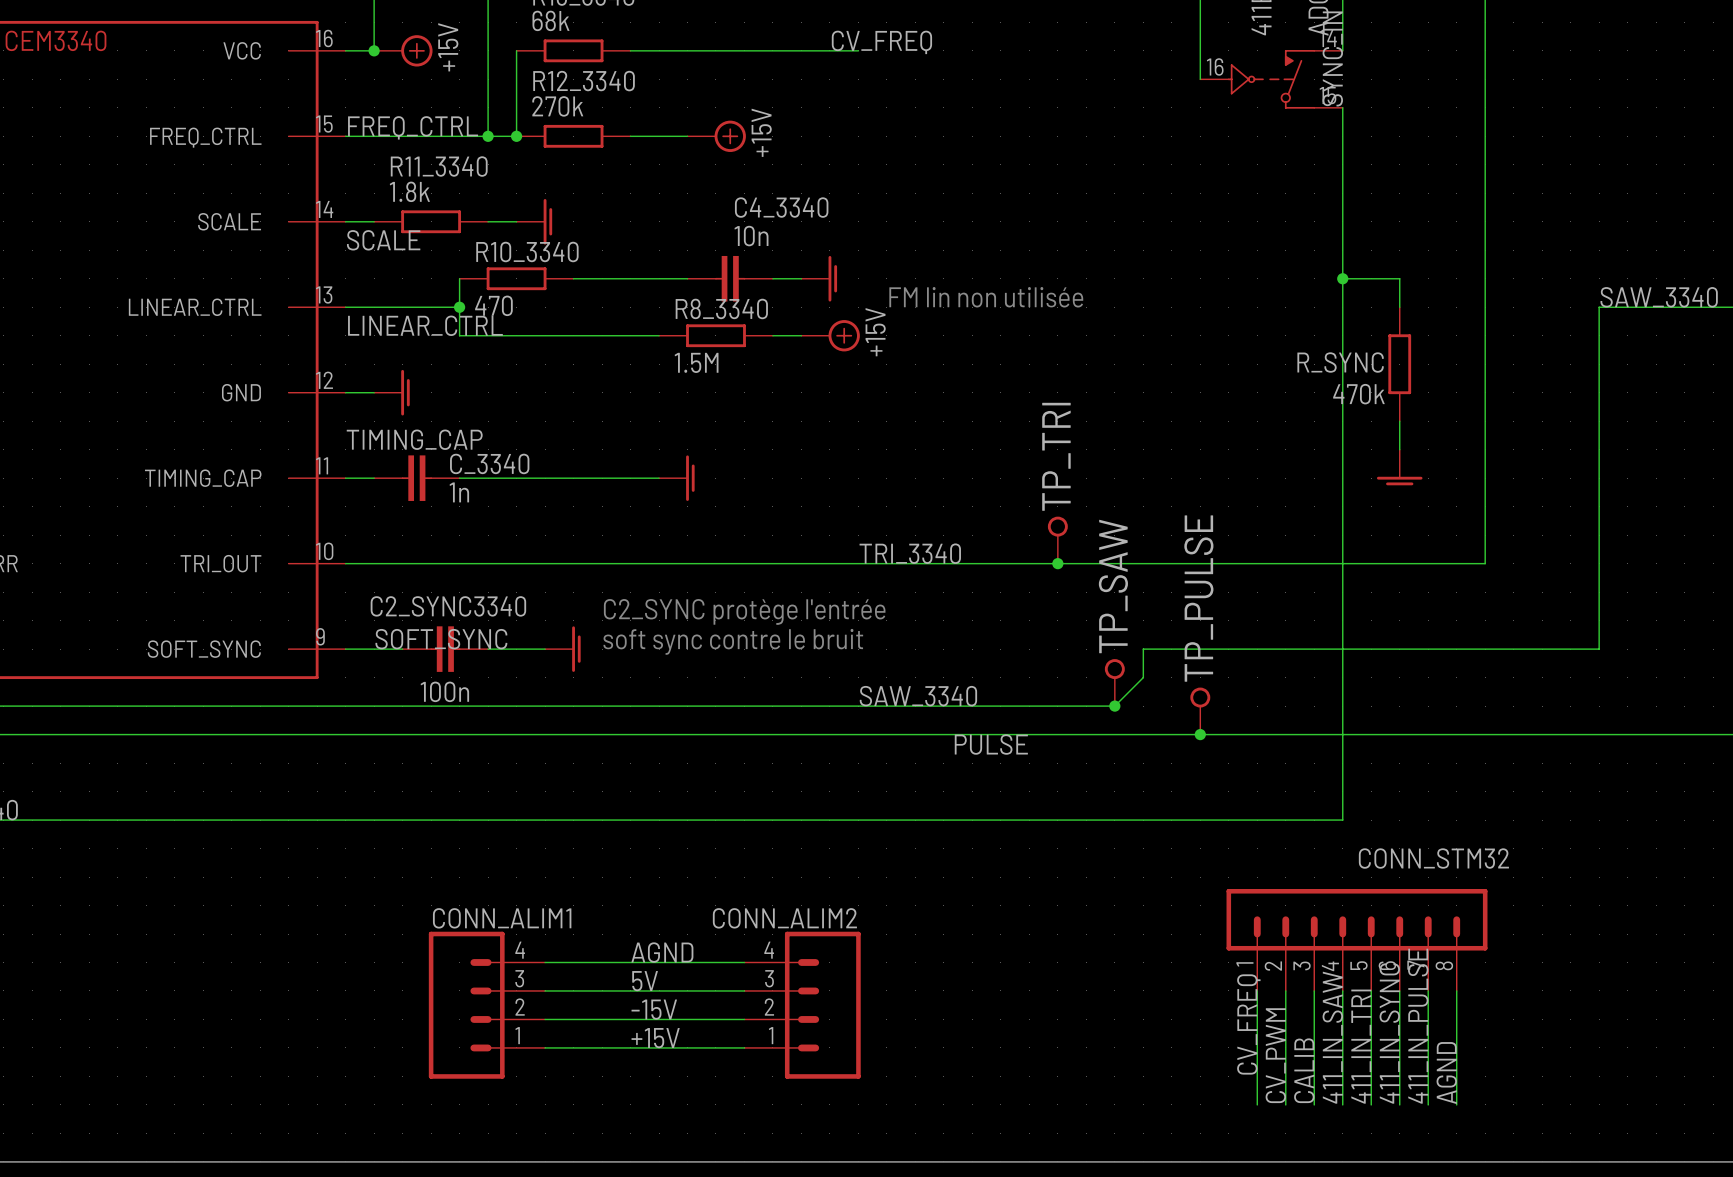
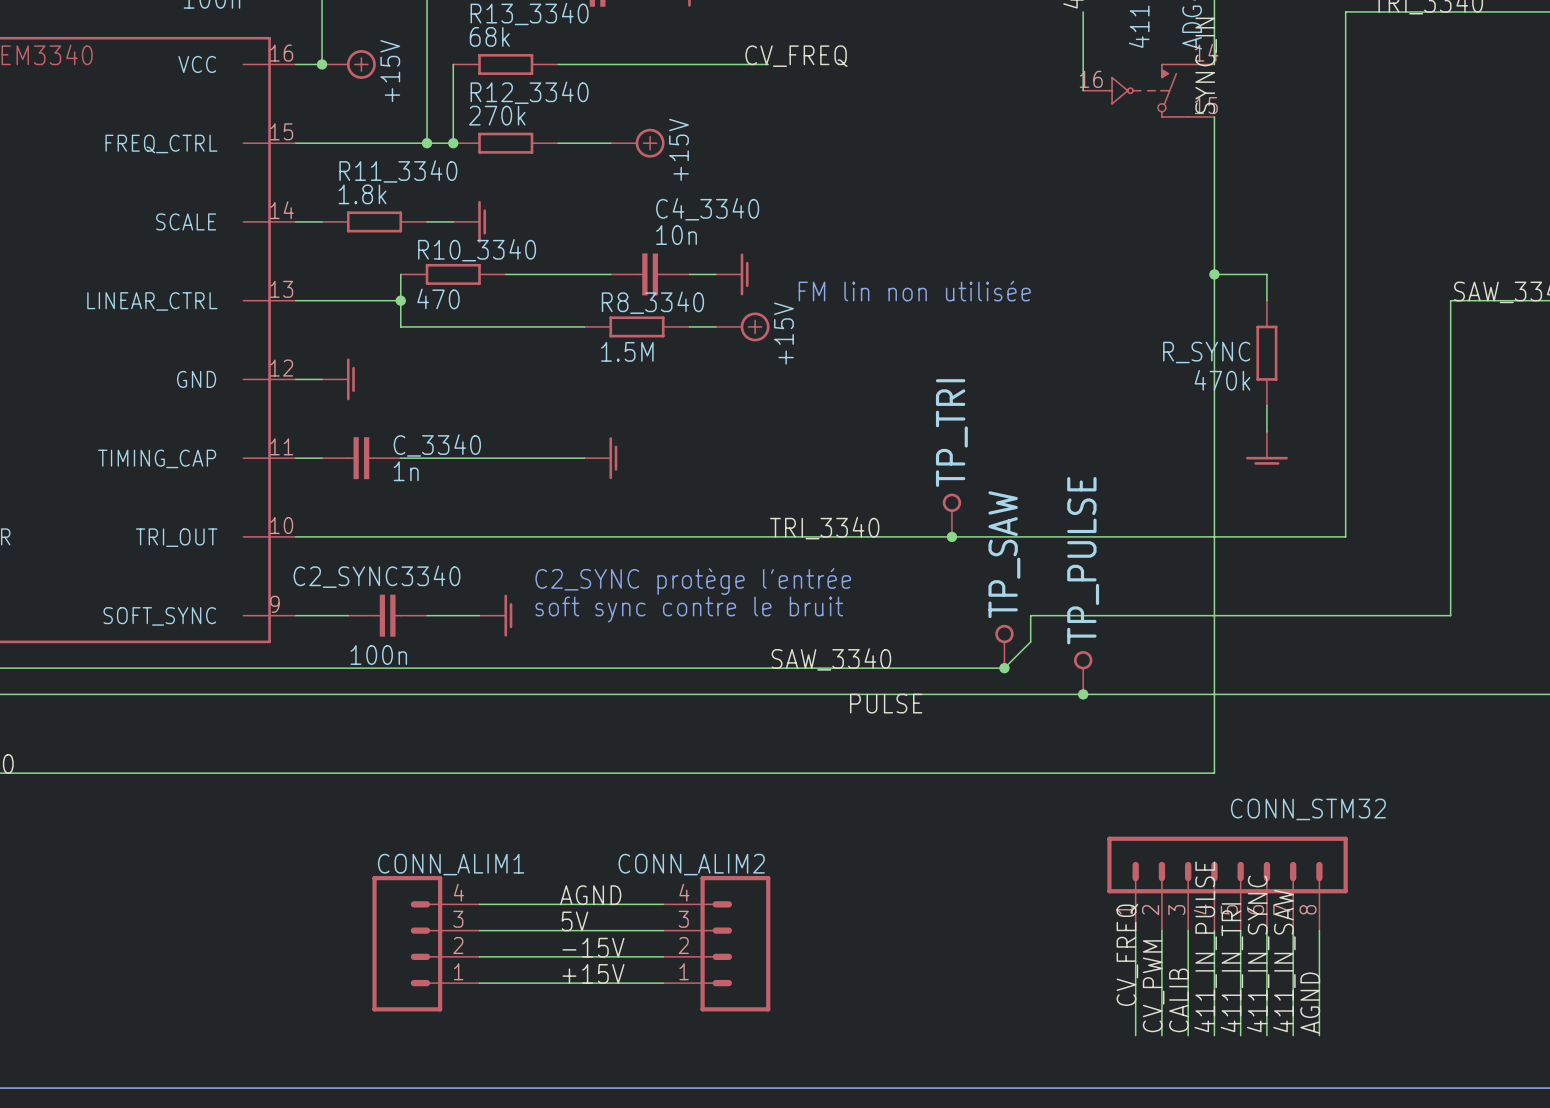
label: FREQ_CTRL (413, 127) -> none
label: SCALE (383, 240) -> none
label: LINEAR_CTRL (425, 325) -> none
label: TIMING_CAP (414, 439) -> none
label: SOFT_SYNC (441, 639) -> none
label: 411_IN_PULSE (1418, 1026) -> 411_IN_SAW (1284, 961)
label: 411_IN_SAW (1332, 1037) -> 411_IN_PULSE (1205, 946)

